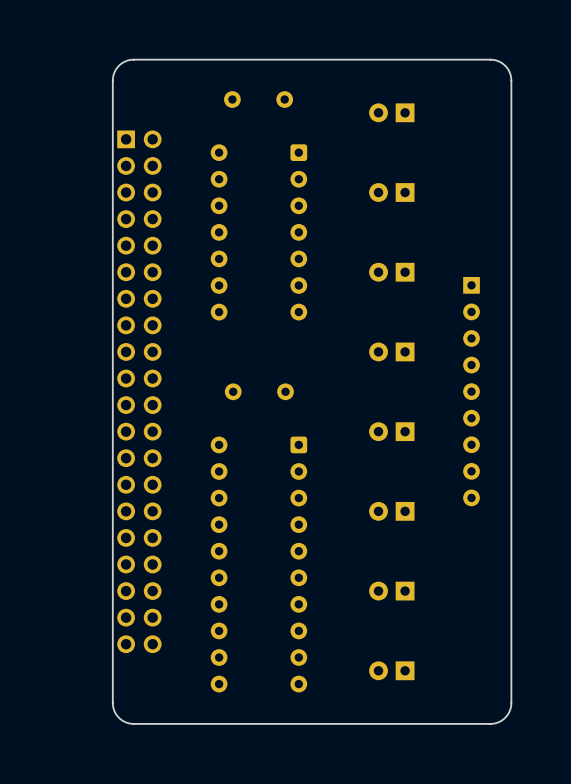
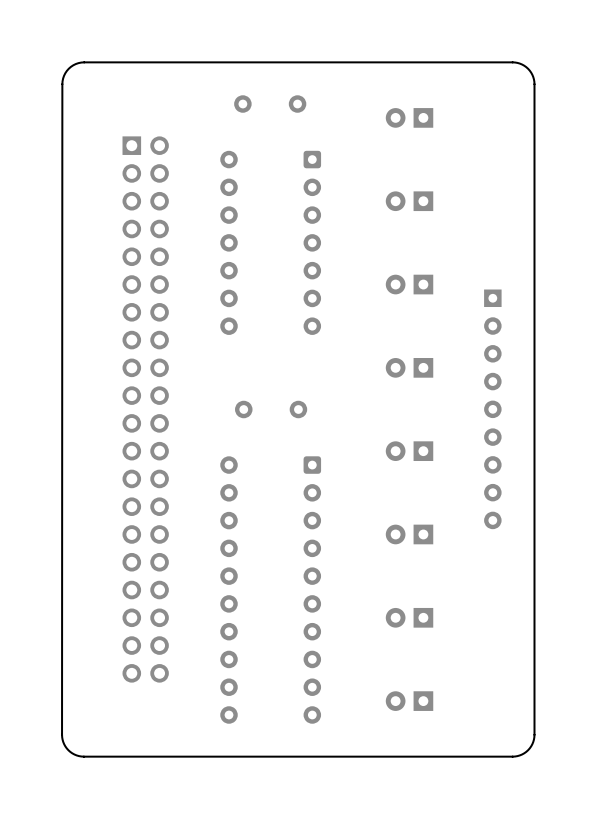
board edge: (133, 59) (124, 61) (118, 65) (113, 73) (112, 80) (112, 703) (114, 712) (118, 717) (126, 722) (133, 723) -> (139, 62) (78, 63) (66, 70) (62, 81) (62, 734) (66, 748) (79, 756) (139, 756)

